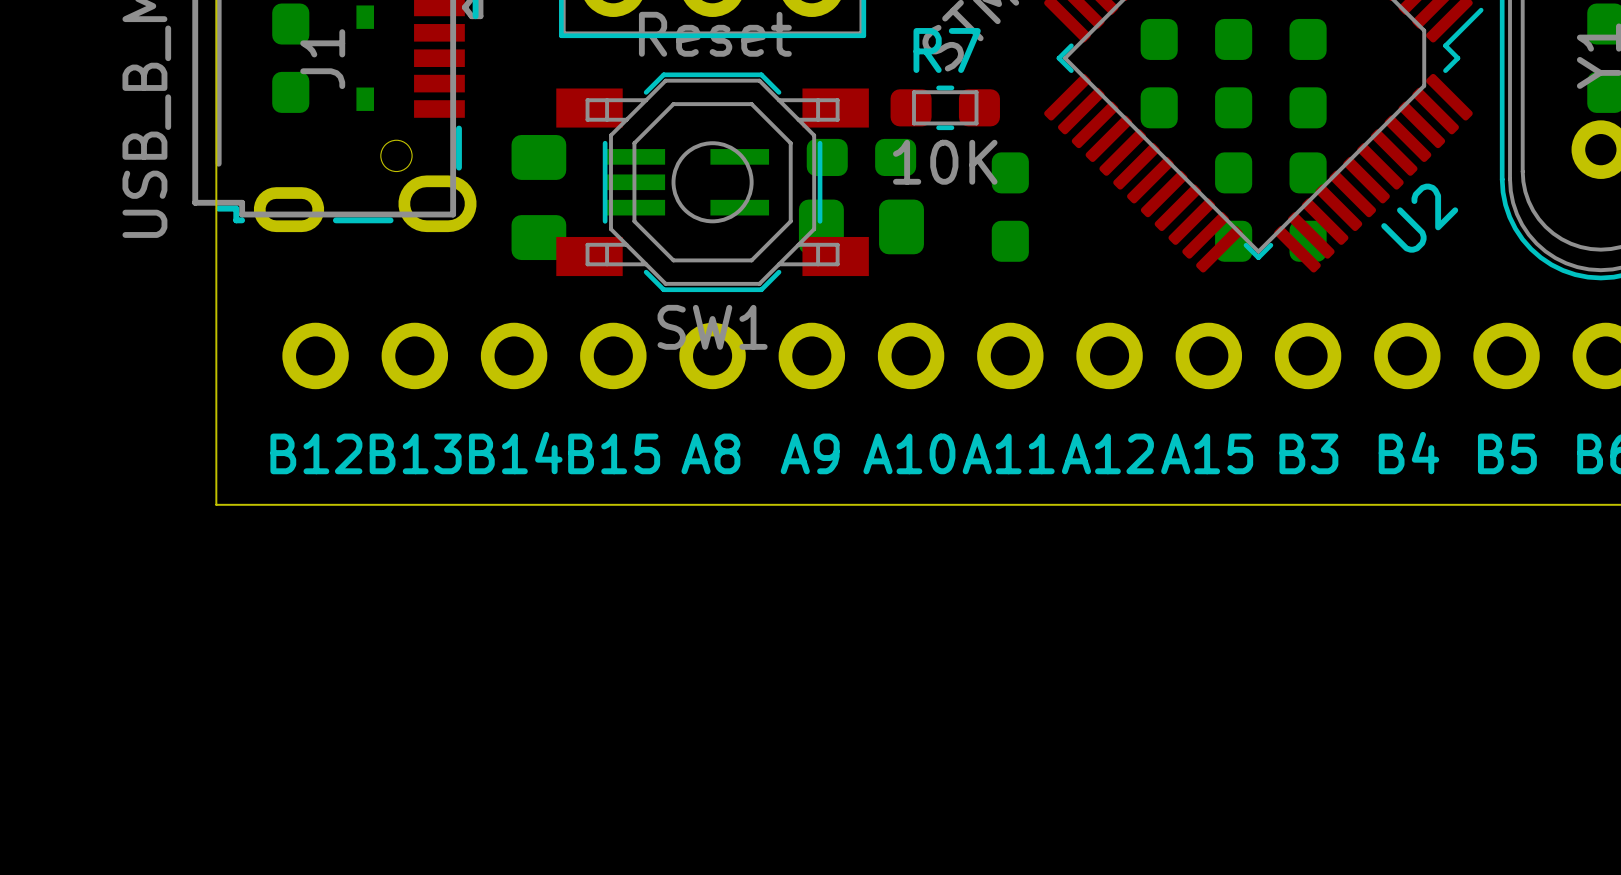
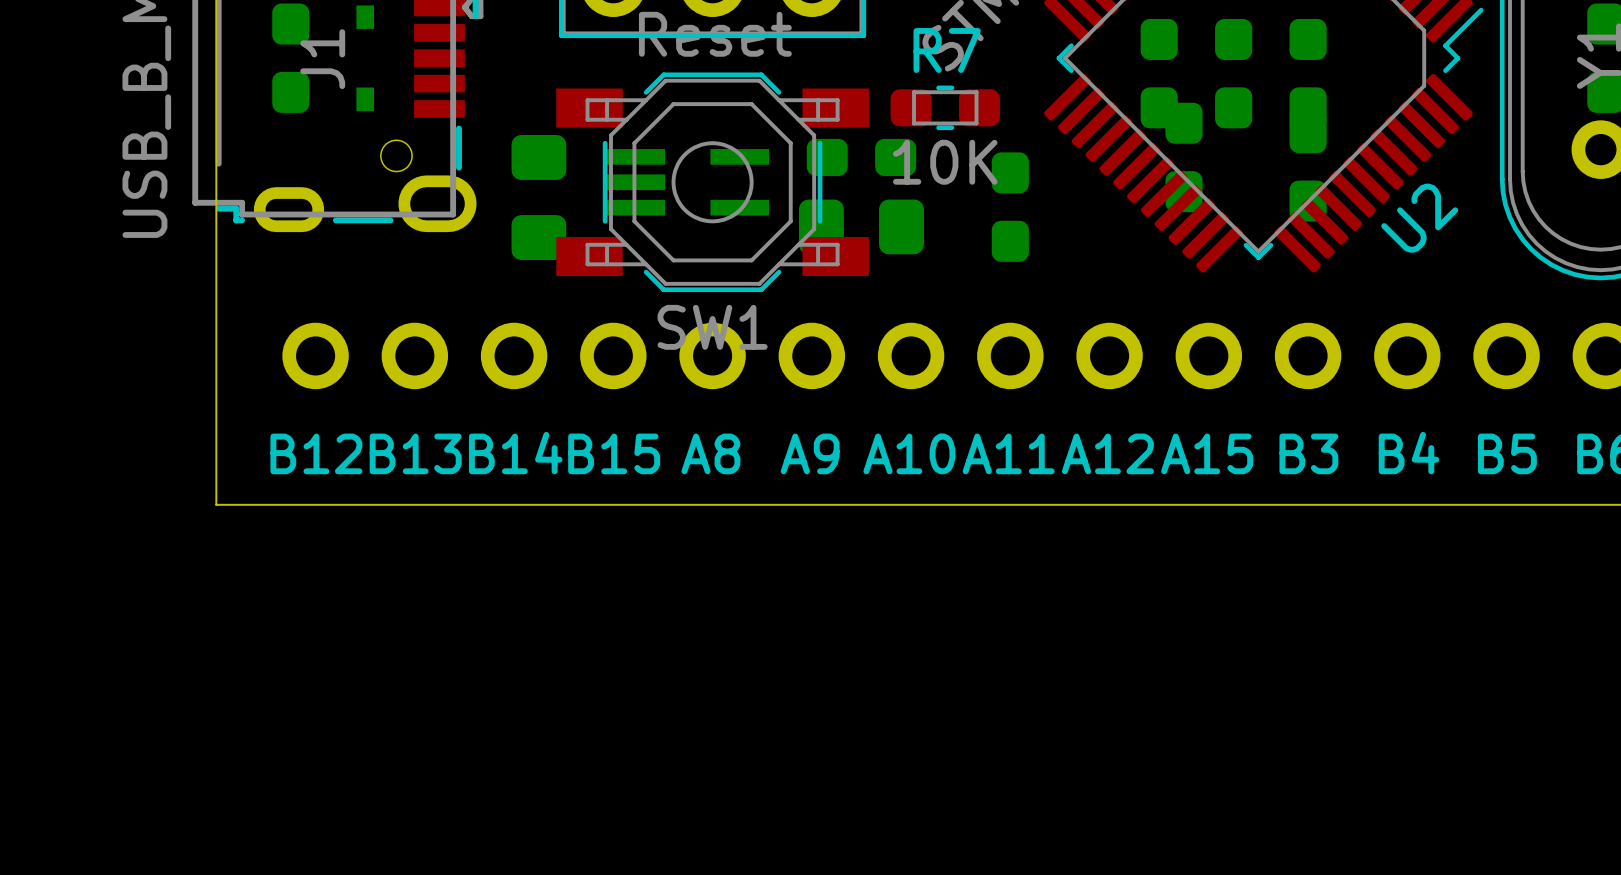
part: none -> (1184, 157)
part: (1233, 207) -> none
part position: (1308, 207) -> (1308, 166)

